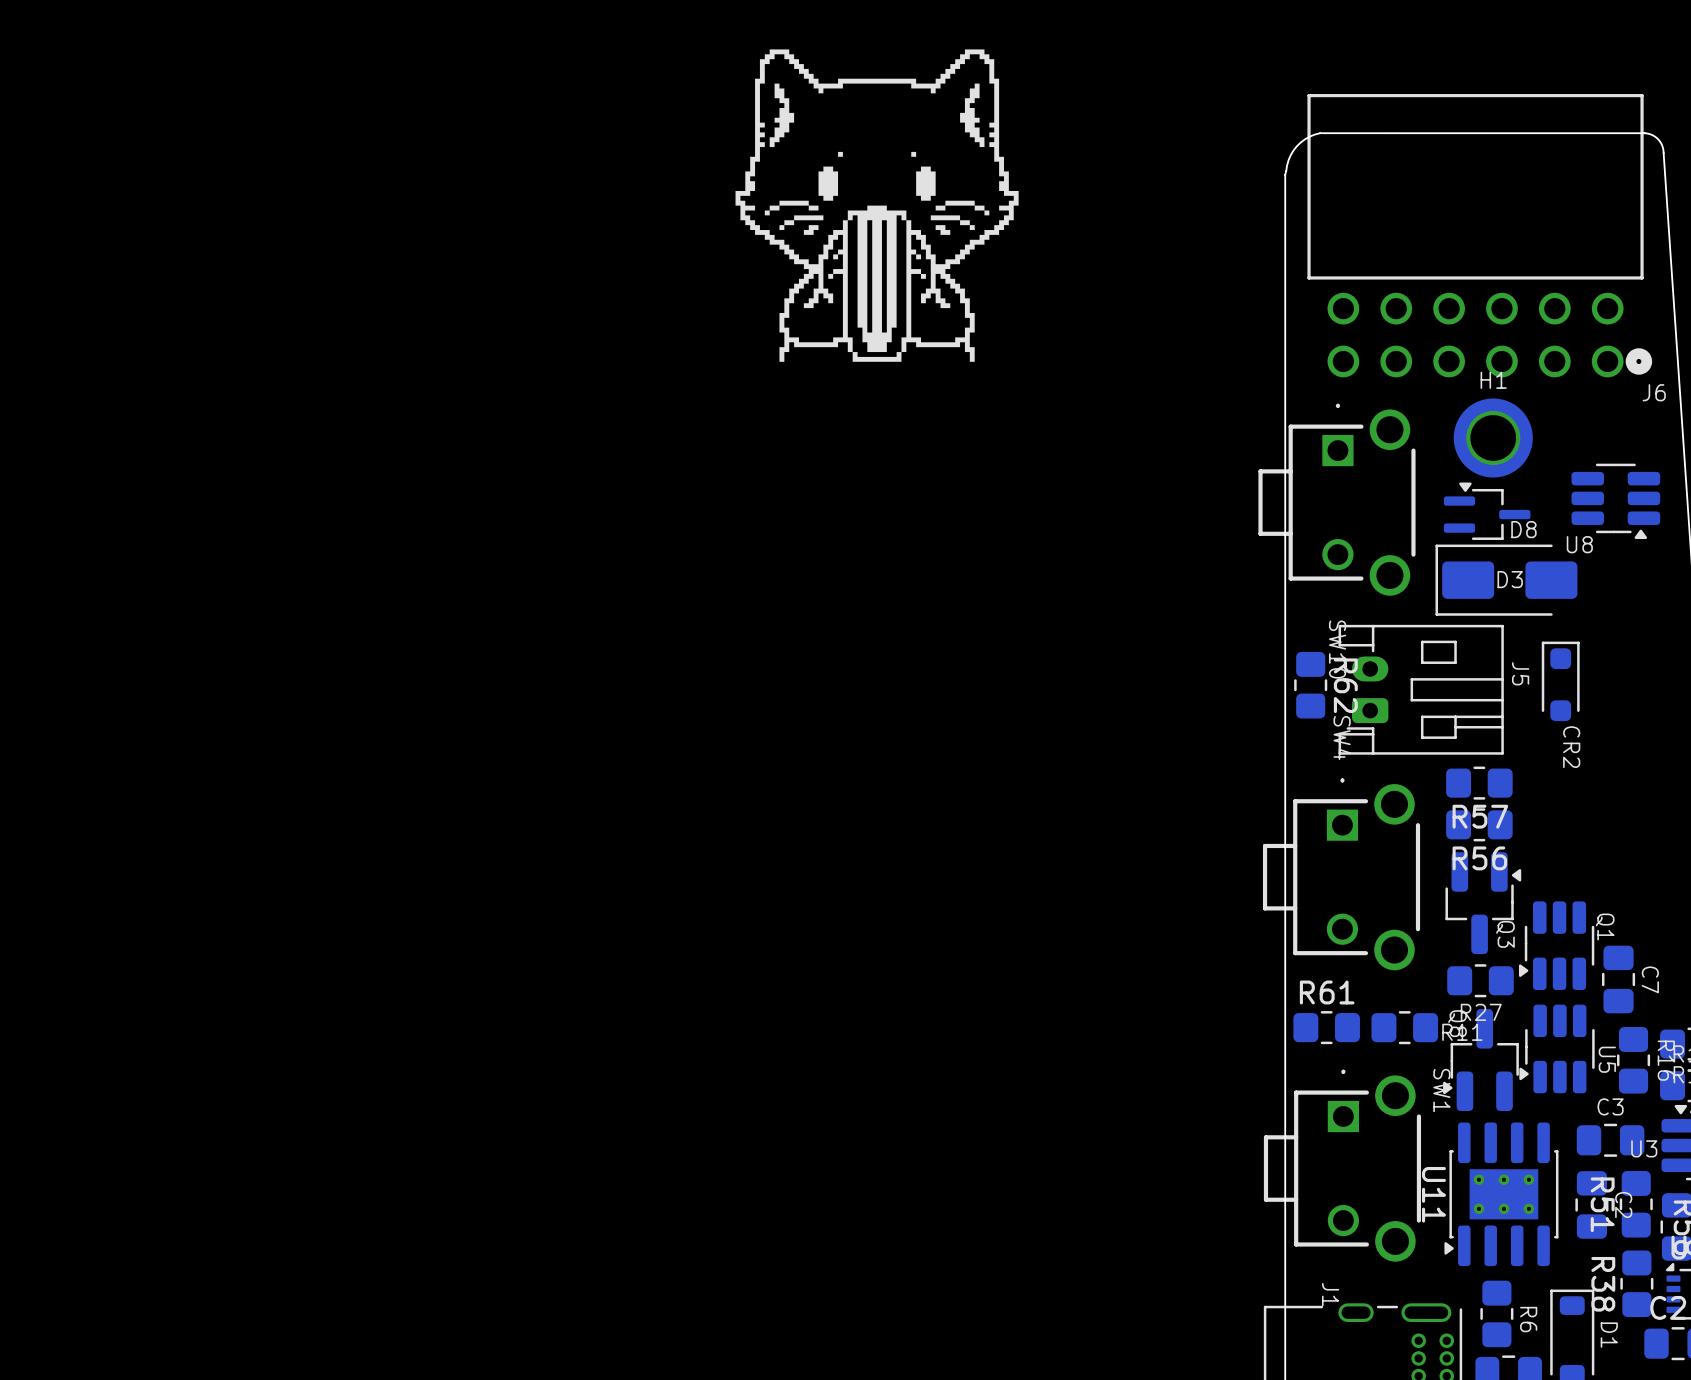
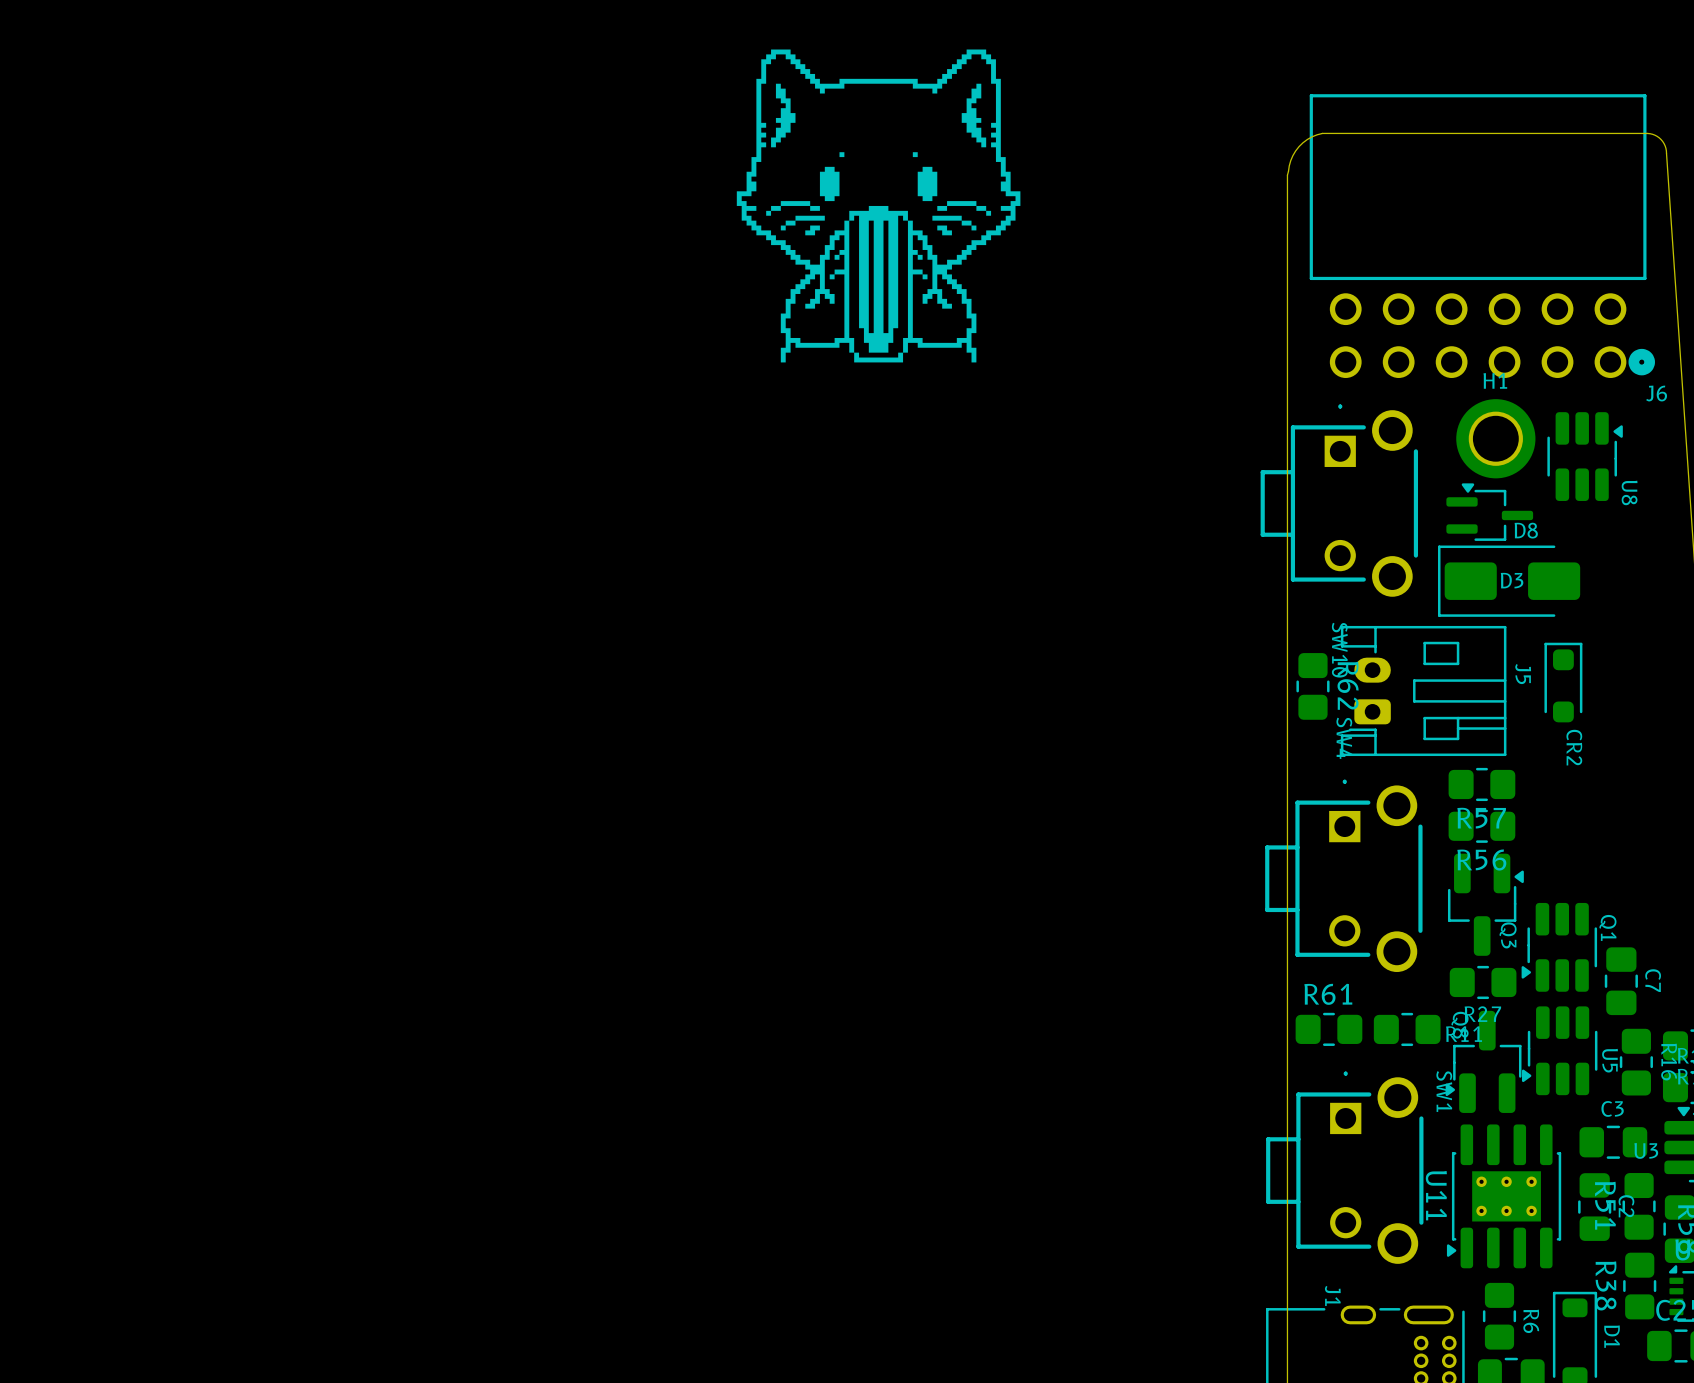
U8 rotation: 0° (1615, 501) -> 90° counterclockwise (1585, 456)
U8 position: (1615, 501) -> (1585, 456)

